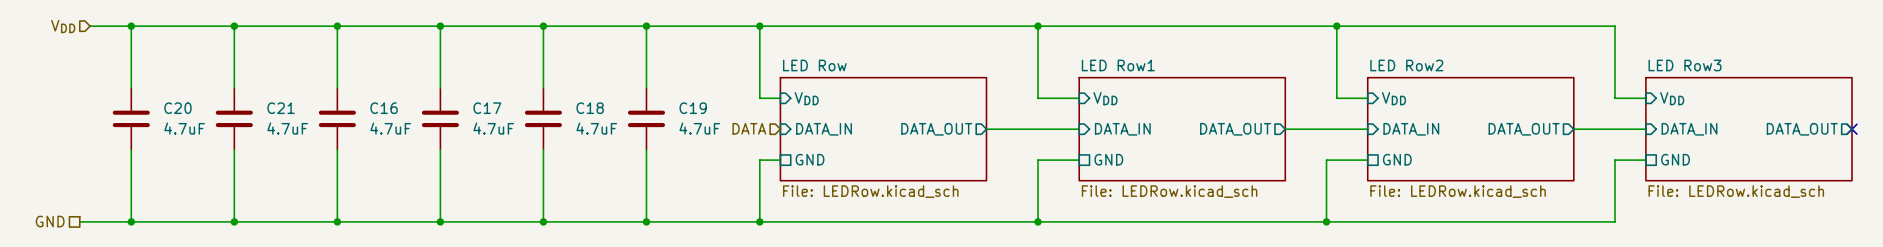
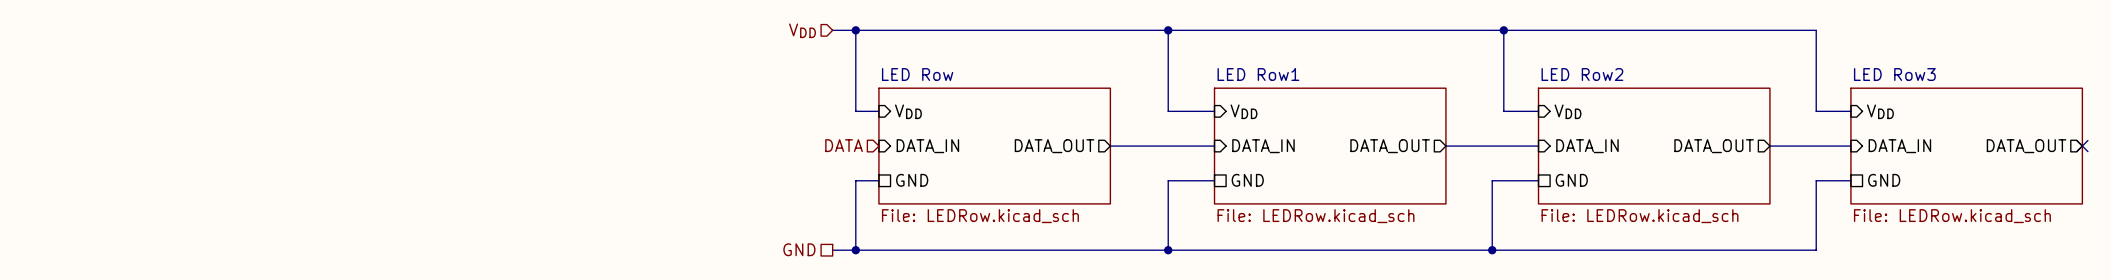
hierarchical label: VDD (63, 26) -> none
wire: (90, 26) (739, 26) -> none
wire: (131, 26) (131, 87) -> none
junction: (131, 26) -> none
wire: (234, 26) (234, 87) -> none
junction: (234, 26) -> none
wire: (337, 26) (337, 87) -> none
junction: (337, 26) -> none
wire: (440, 26) (440, 87) -> none
junction: (440, 26) -> none
wire: (543, 26) (543, 87) -> none
junction: (543, 26) -> none
wire: (646, 26) (646, 87) -> none
junction: (646, 26) -> none
hierarchical label: none -> VDD (802, 30)
C20: 4.7uF (131, 118) -> none
C21: 4.7uF (234, 118) -> none
C16: 4.7uF (337, 118) -> none
C17: 4.7uF (440, 118) -> none
C18: 4.7uF (543, 118) -> none
C19: 4.7uF (646, 118) -> none
wire: (131, 149) (131, 221) -> none
wire: (234, 149) (234, 221) -> none
wire: (337, 149) (337, 221) -> none
wire: (440, 149) (440, 221) -> none
wire: (543, 149) (543, 221) -> none
wire: (646, 149) (646, 221) -> none
hierarchical label: GND (50, 221) -> none
wire: (79, 221) (739, 221) -> none
junction: (131, 221) -> none
junction: (234, 221) -> none
junction: (337, 221) -> none
junction: (440, 221) -> none
junction: (543, 221) -> none
junction: (646, 221) -> none
hierarchical label: none -> GND (799, 249)

